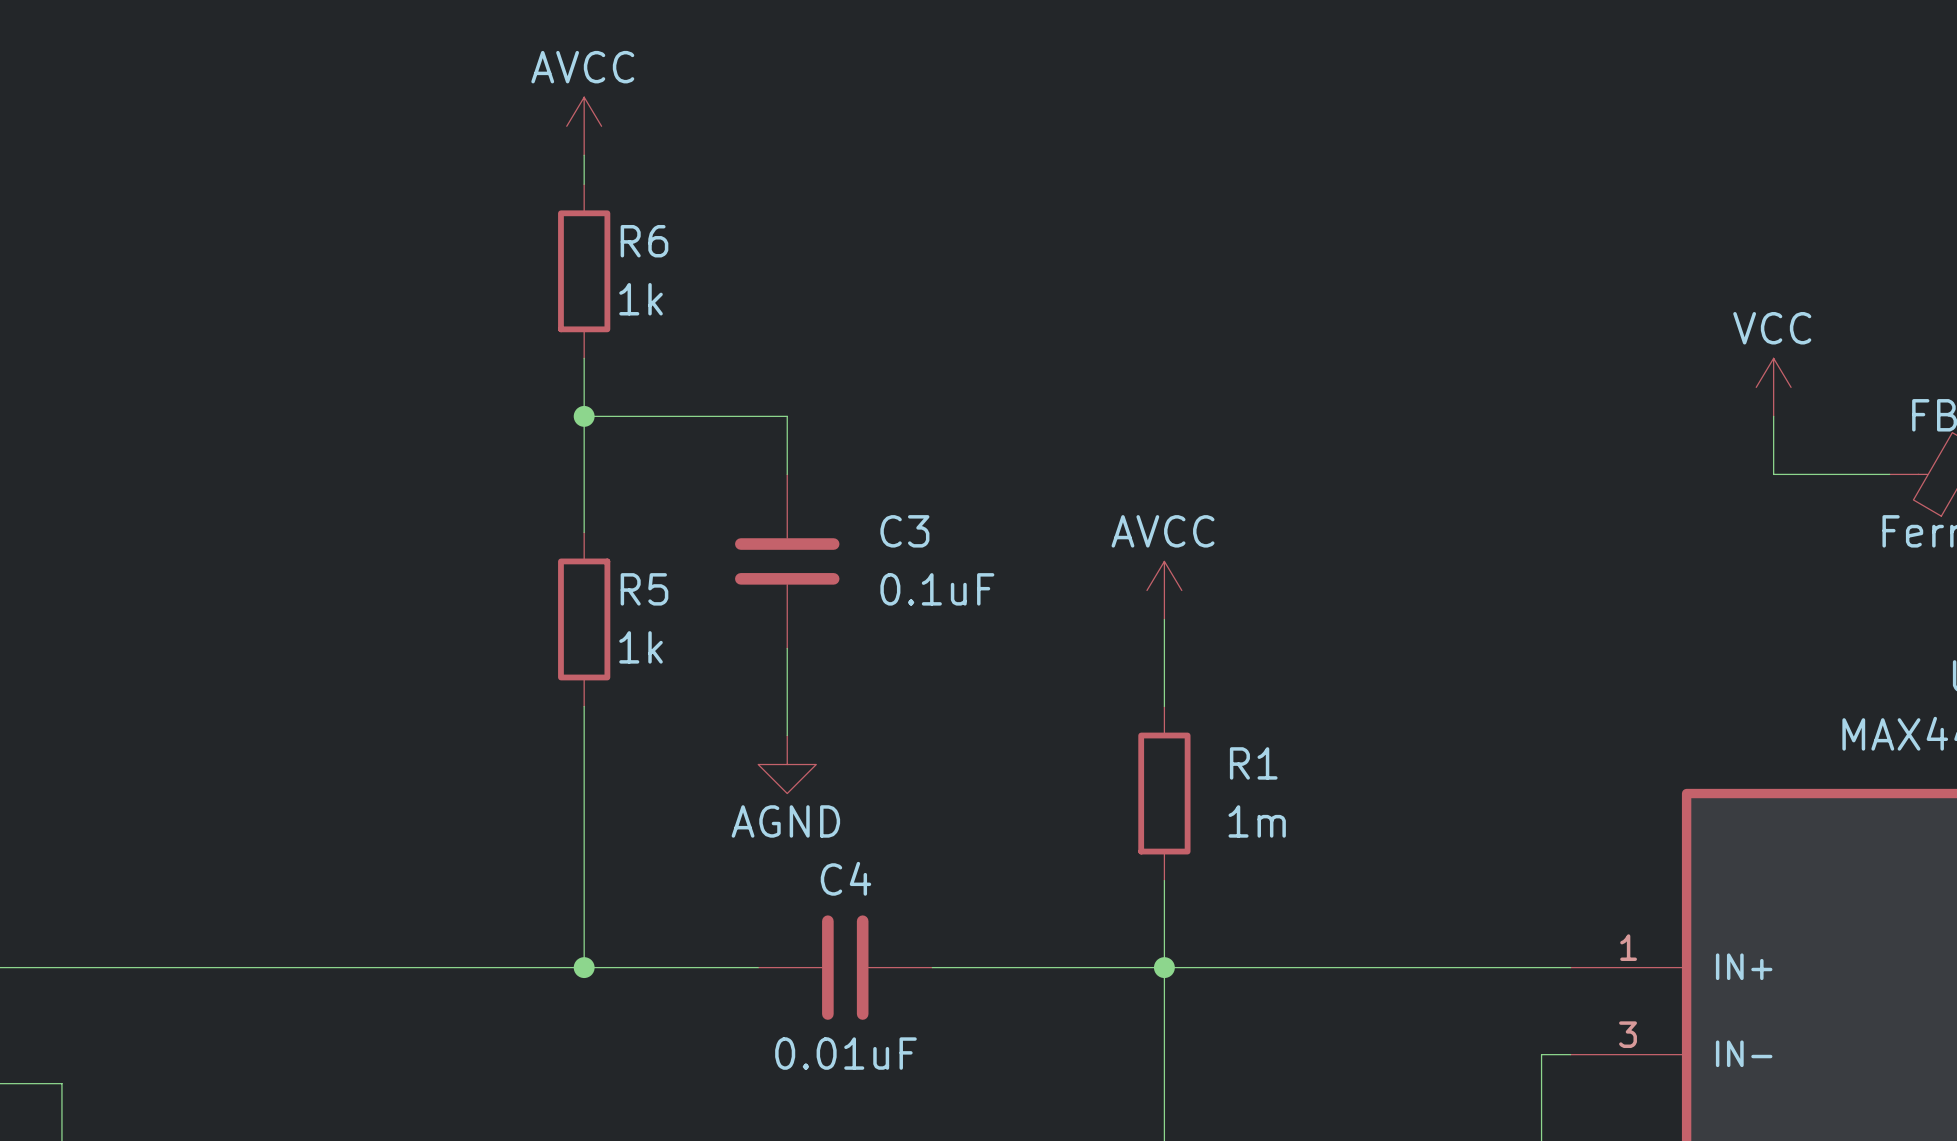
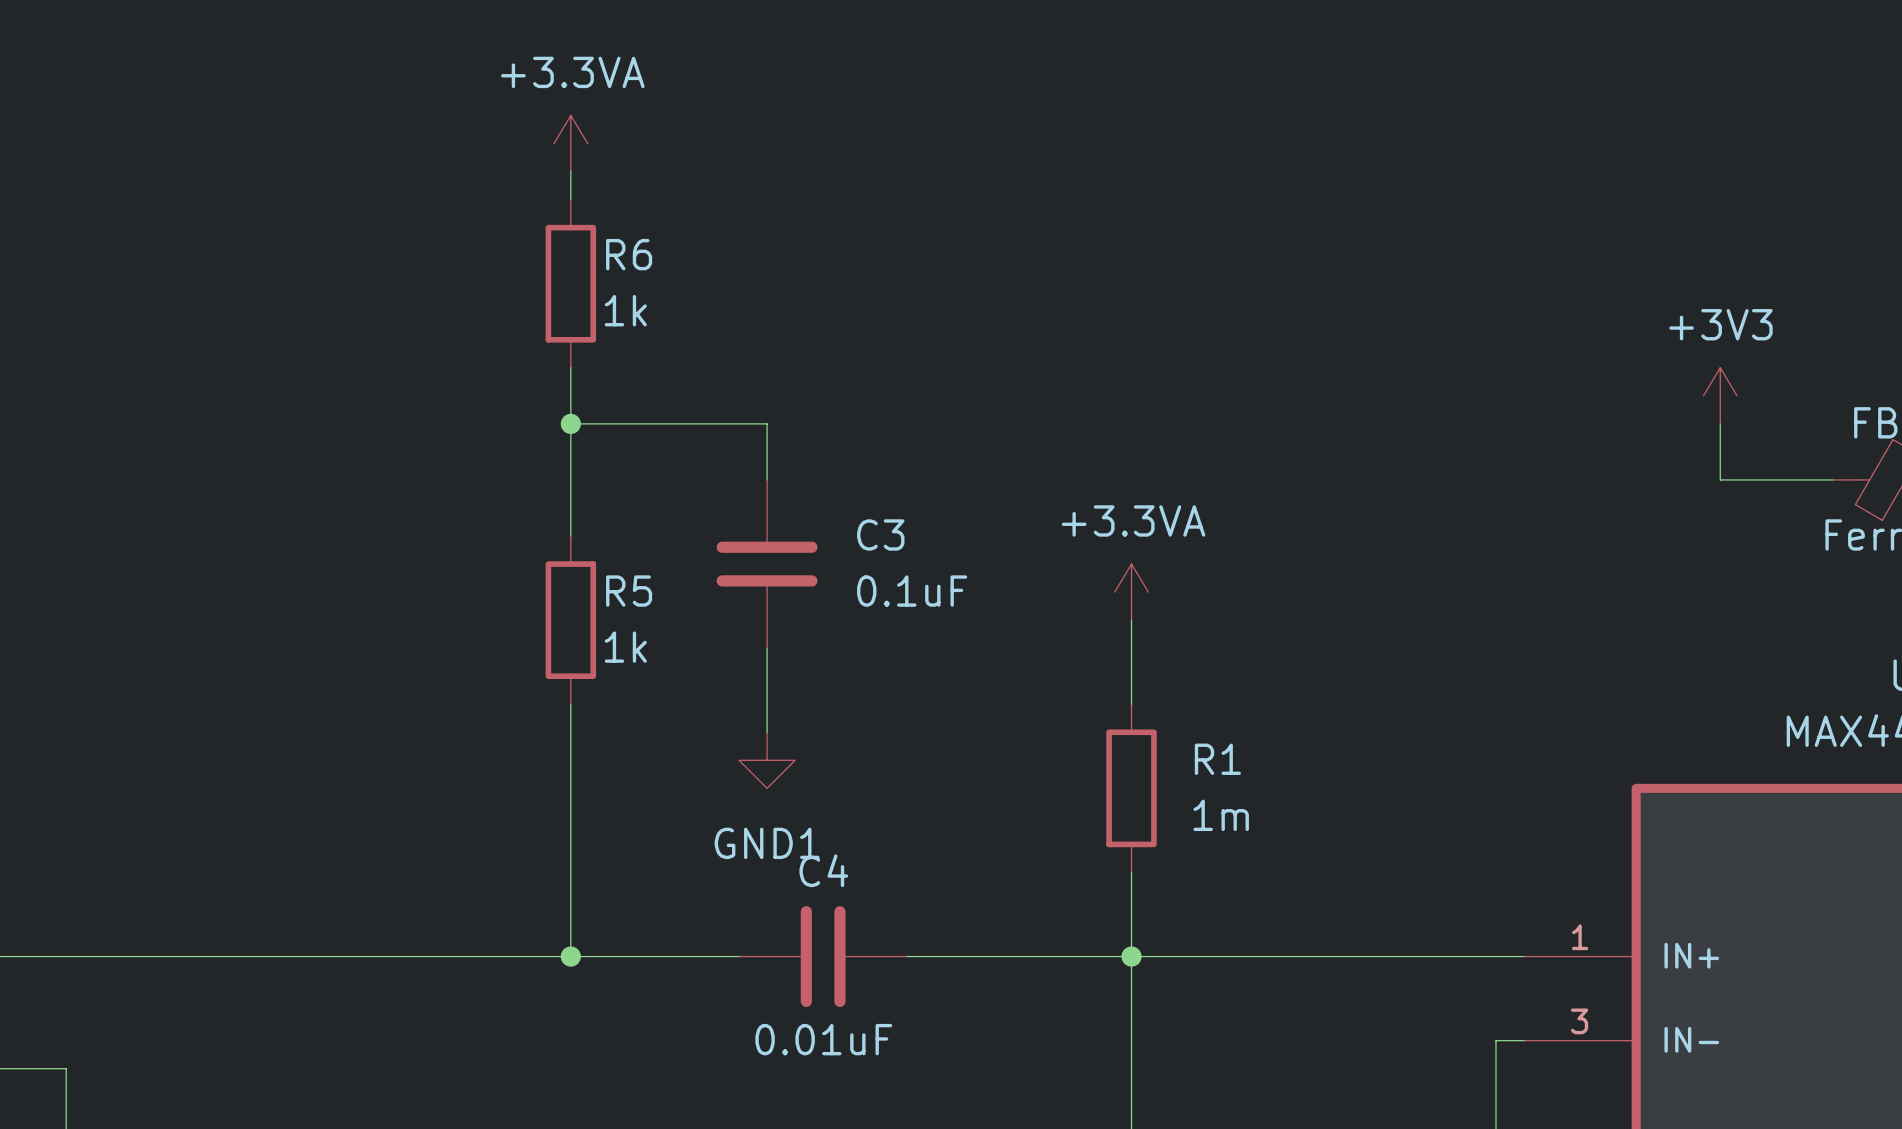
power symbol: AVCC (584, 126) -> +3.3VA (570, 143)
power symbol: VCC (1773, 387) -> +3V3 (1720, 395)
power symbol: AVCC (1164, 590) -> +3.3VA (1131, 592)
power symbol: AGND (787, 764) -> GND1 (767, 760)

